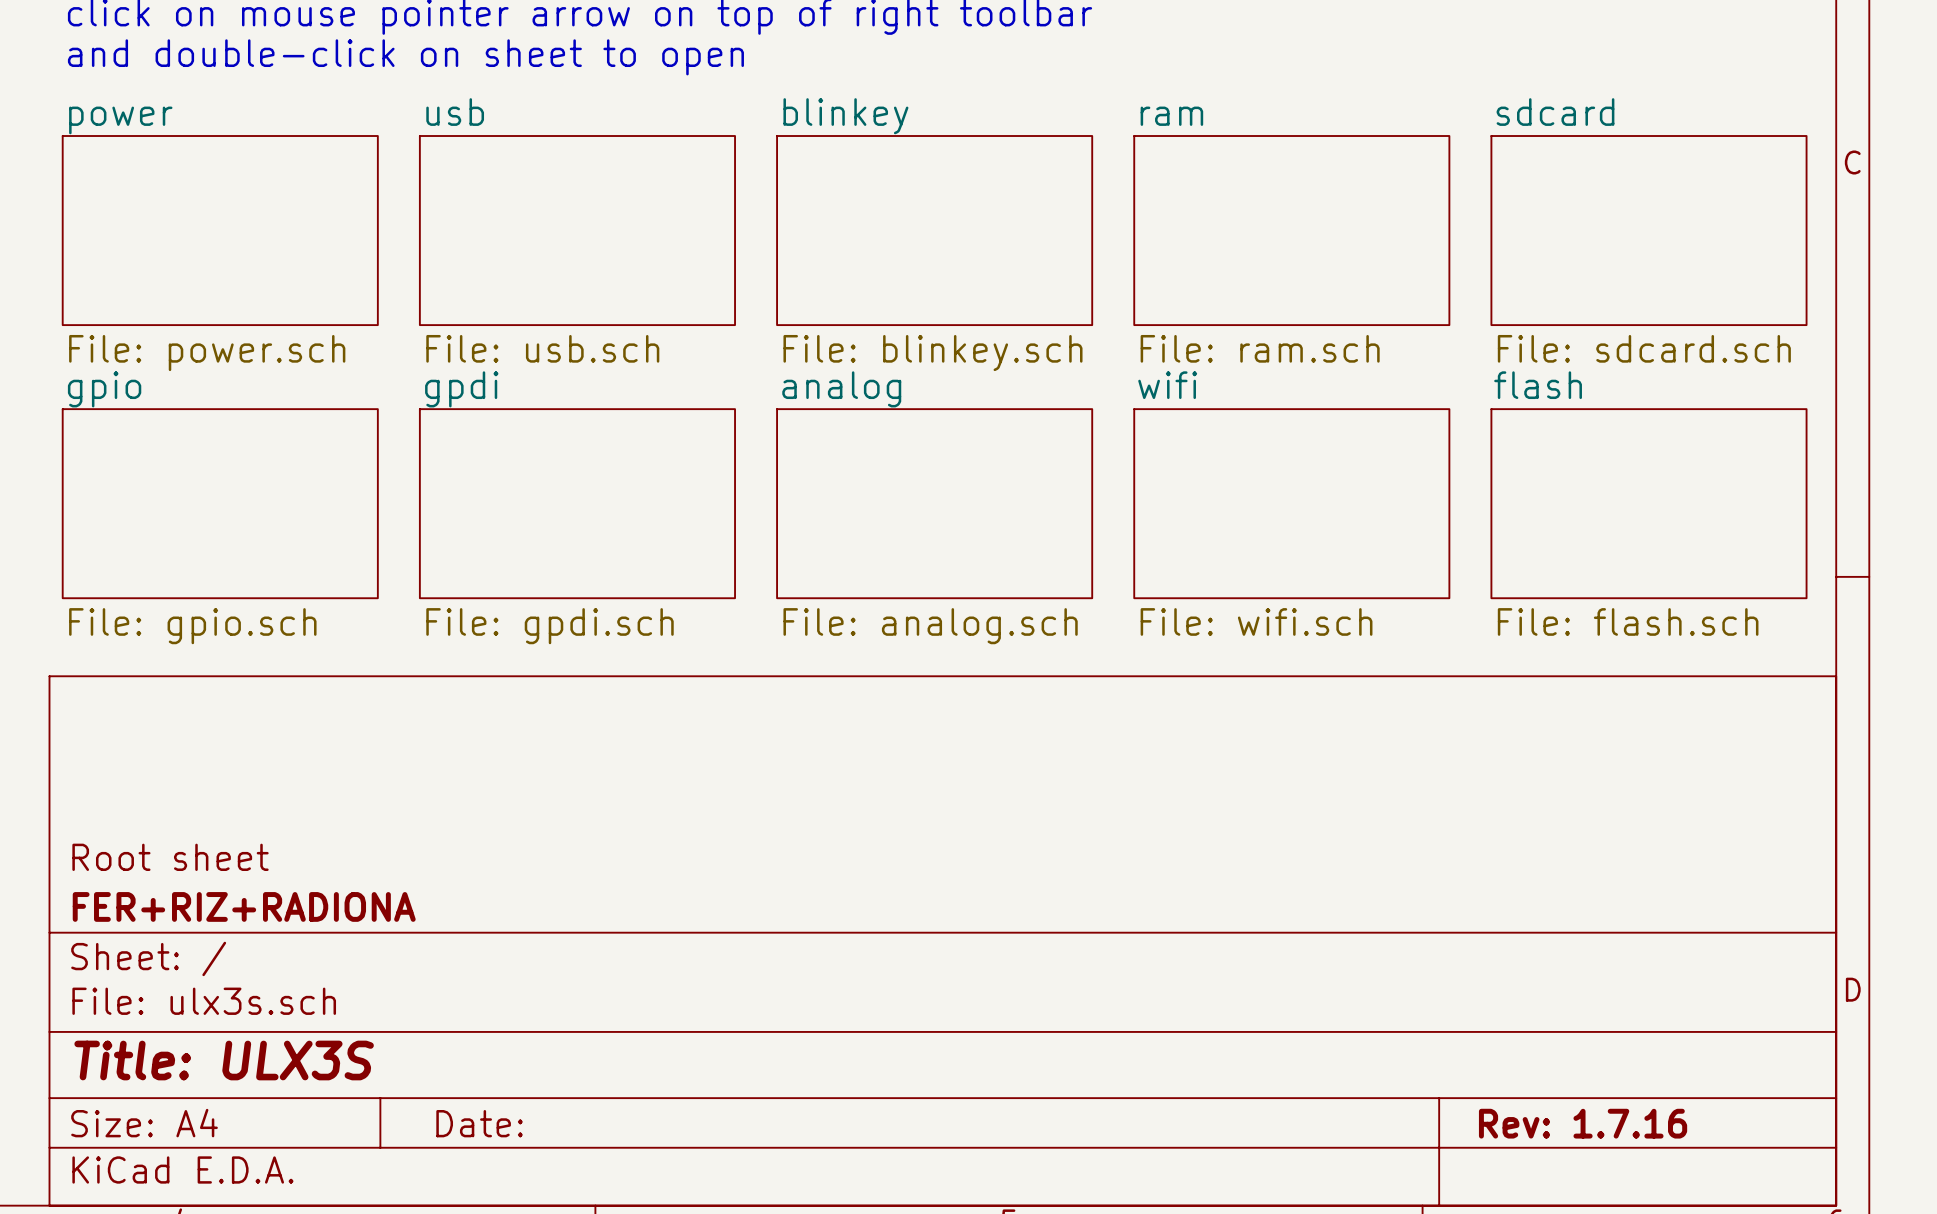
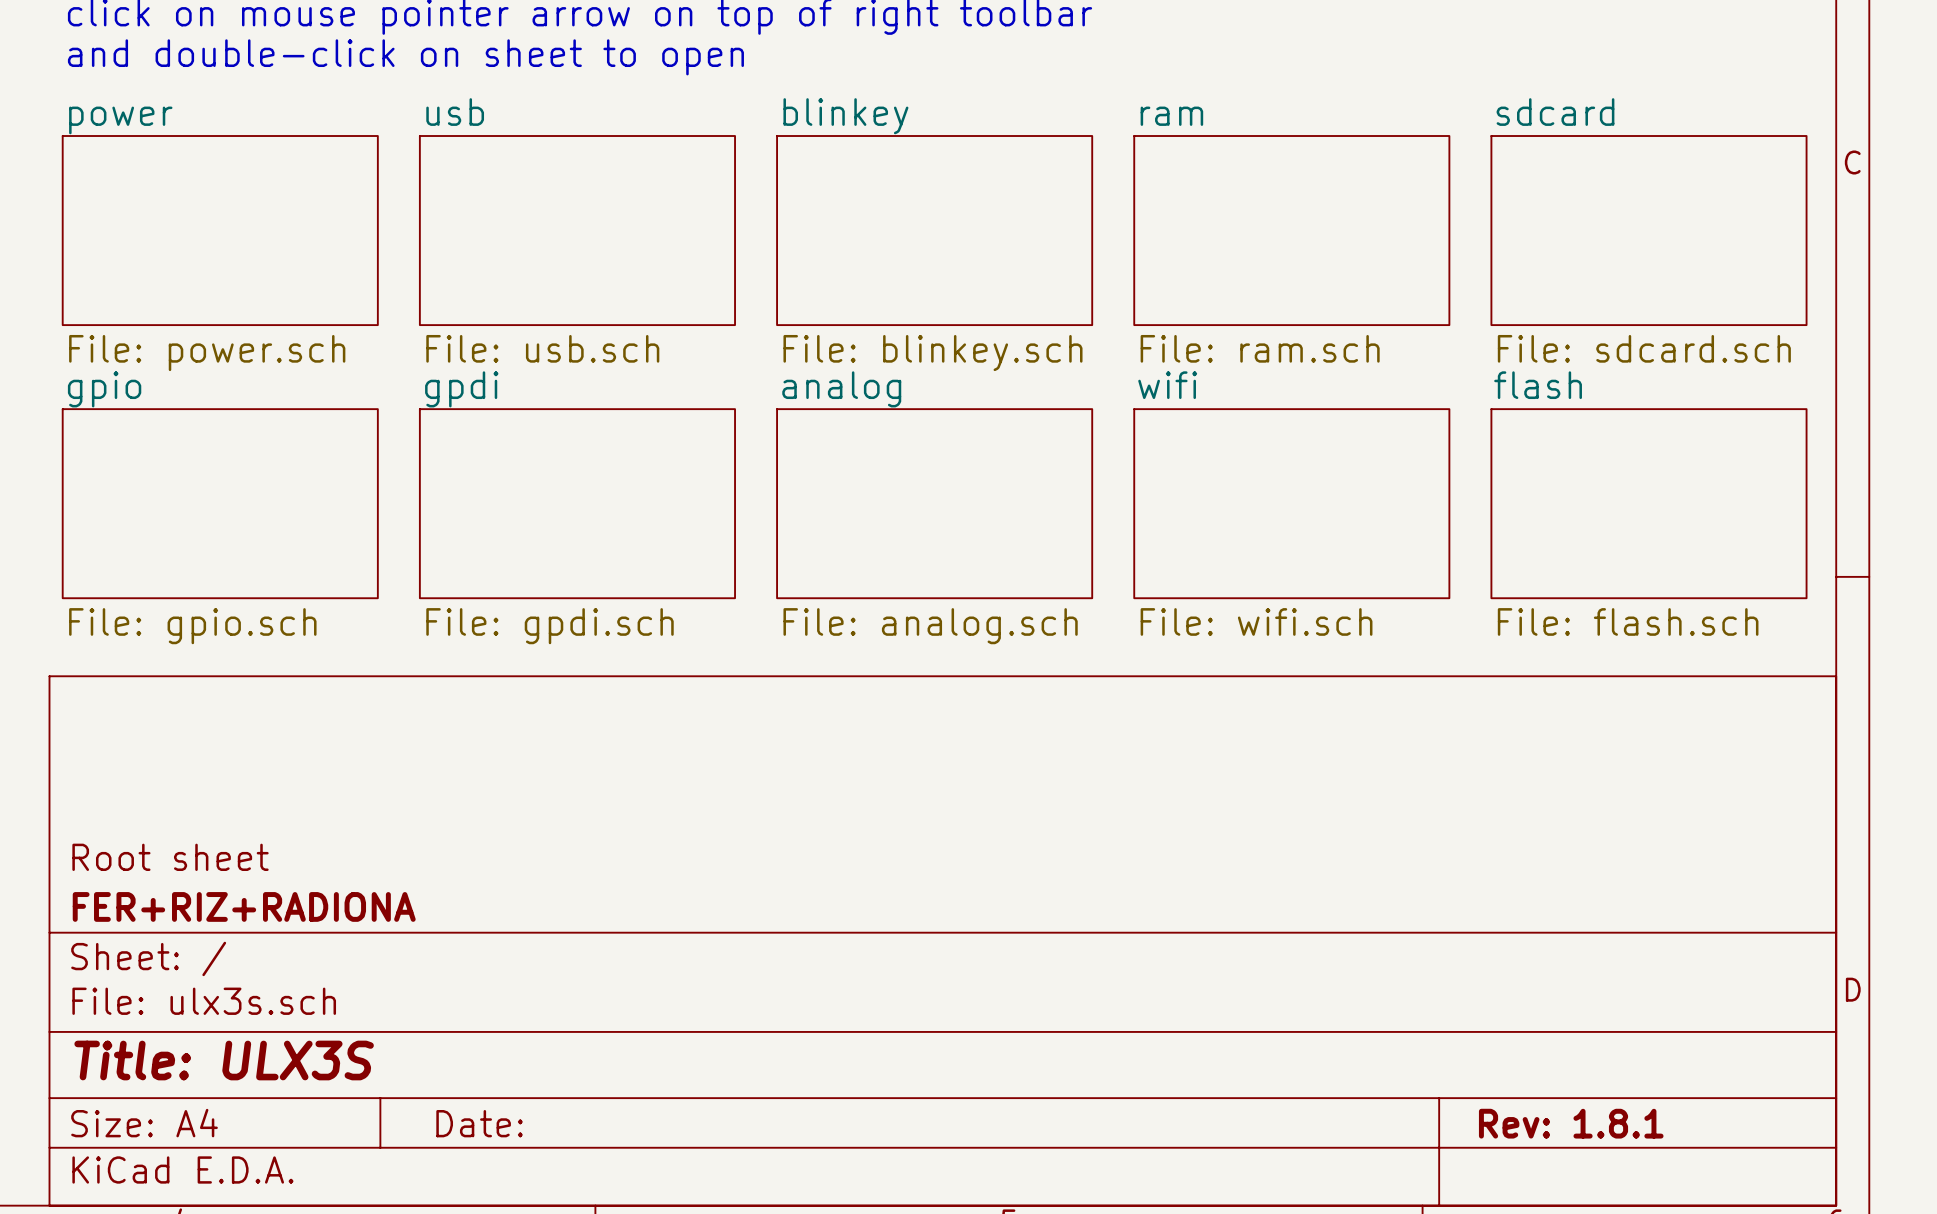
title block: Rev: 1.7.16 (1583, 1123) -> Rev: 1.8.1 (1571, 1123)

